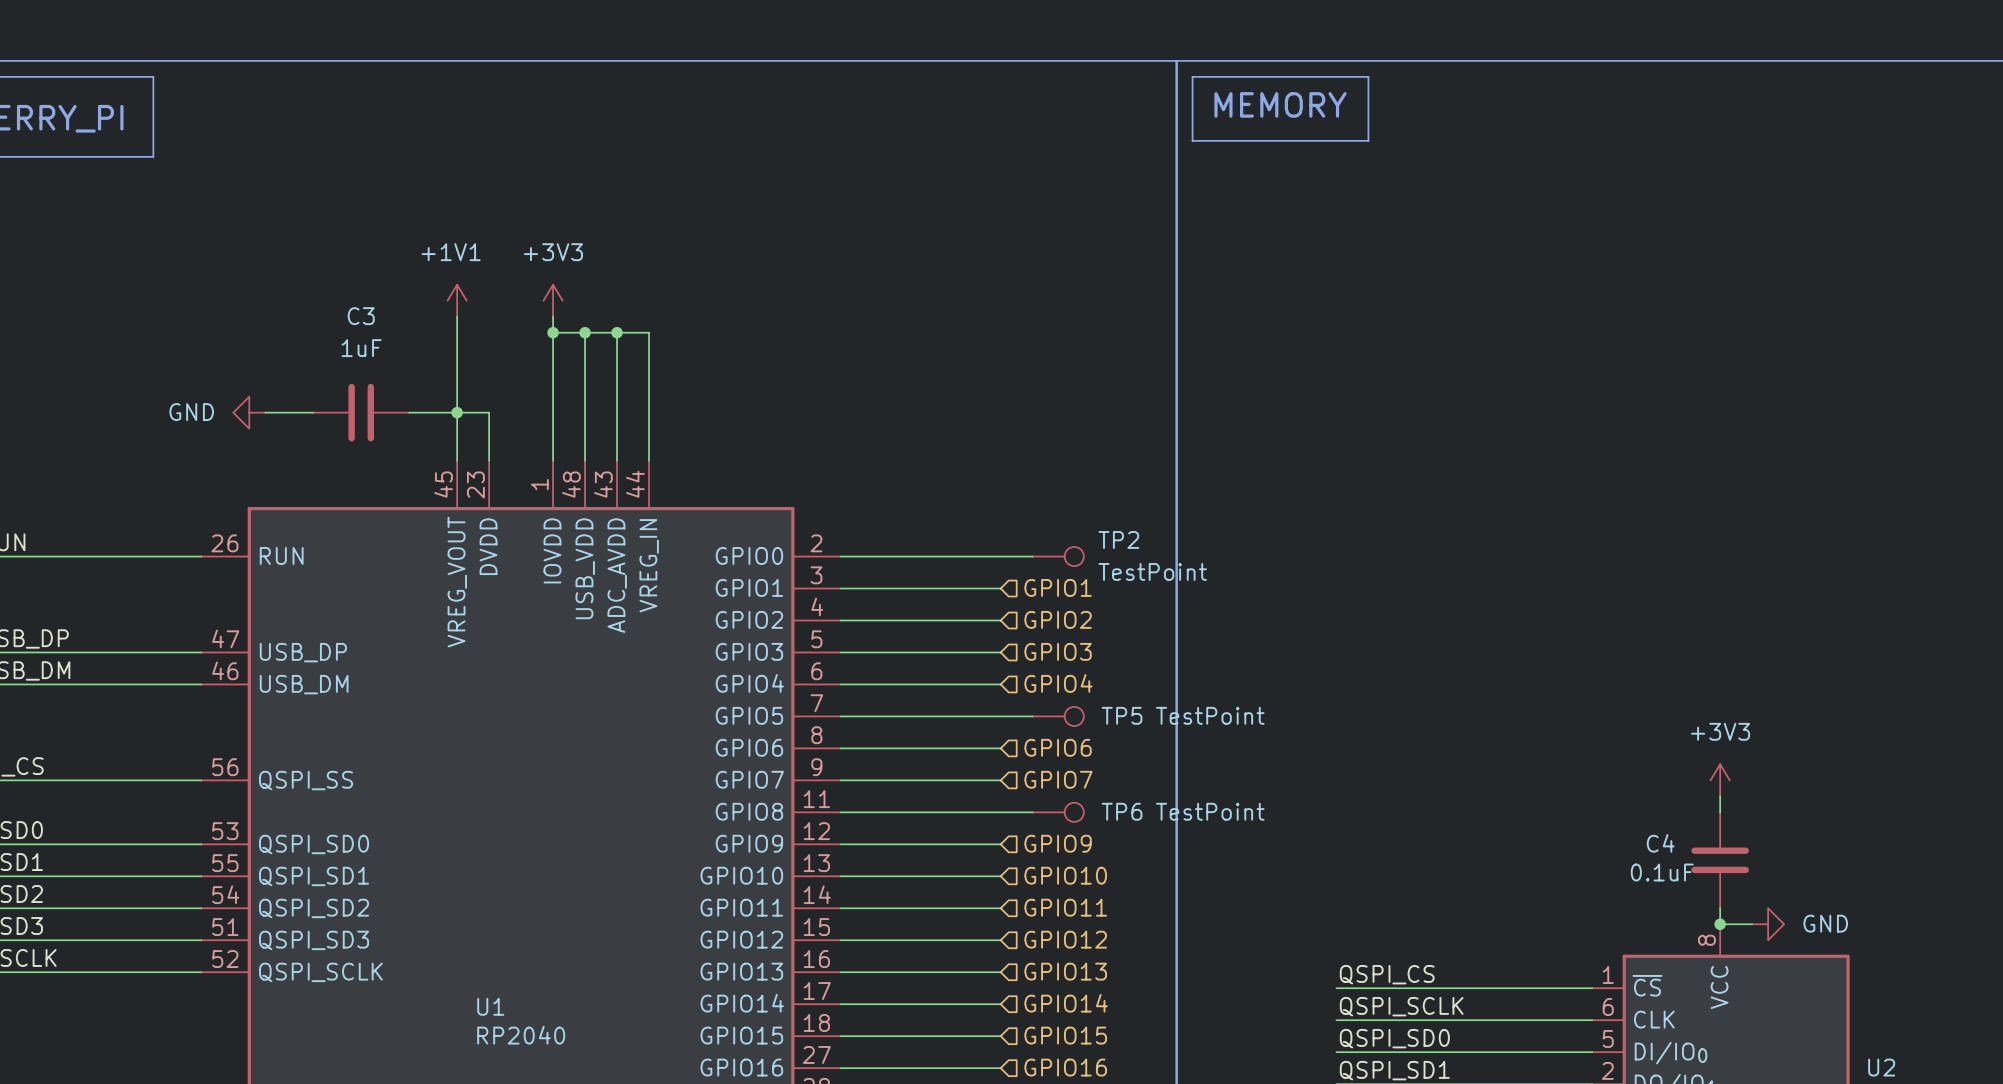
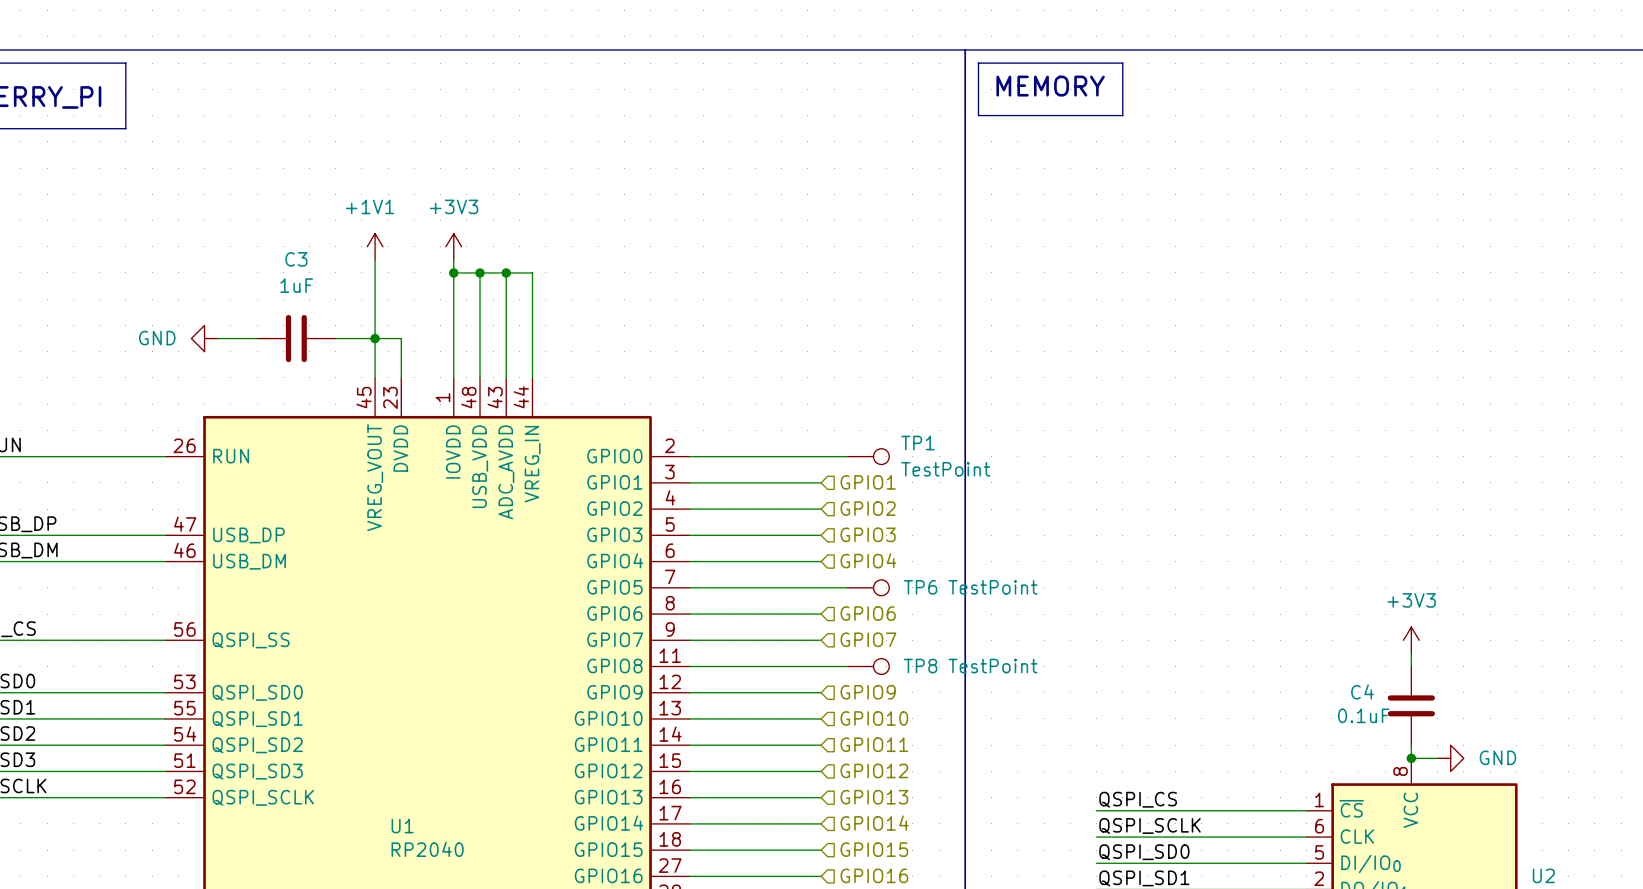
TP2 name: TP2 (1118, 539) -> TP1 (917, 443)
TP5 name: TP5 (1122, 715) -> TP6 (920, 587)
TP6 name: TP6 (1122, 811) -> TP8 (920, 666)

